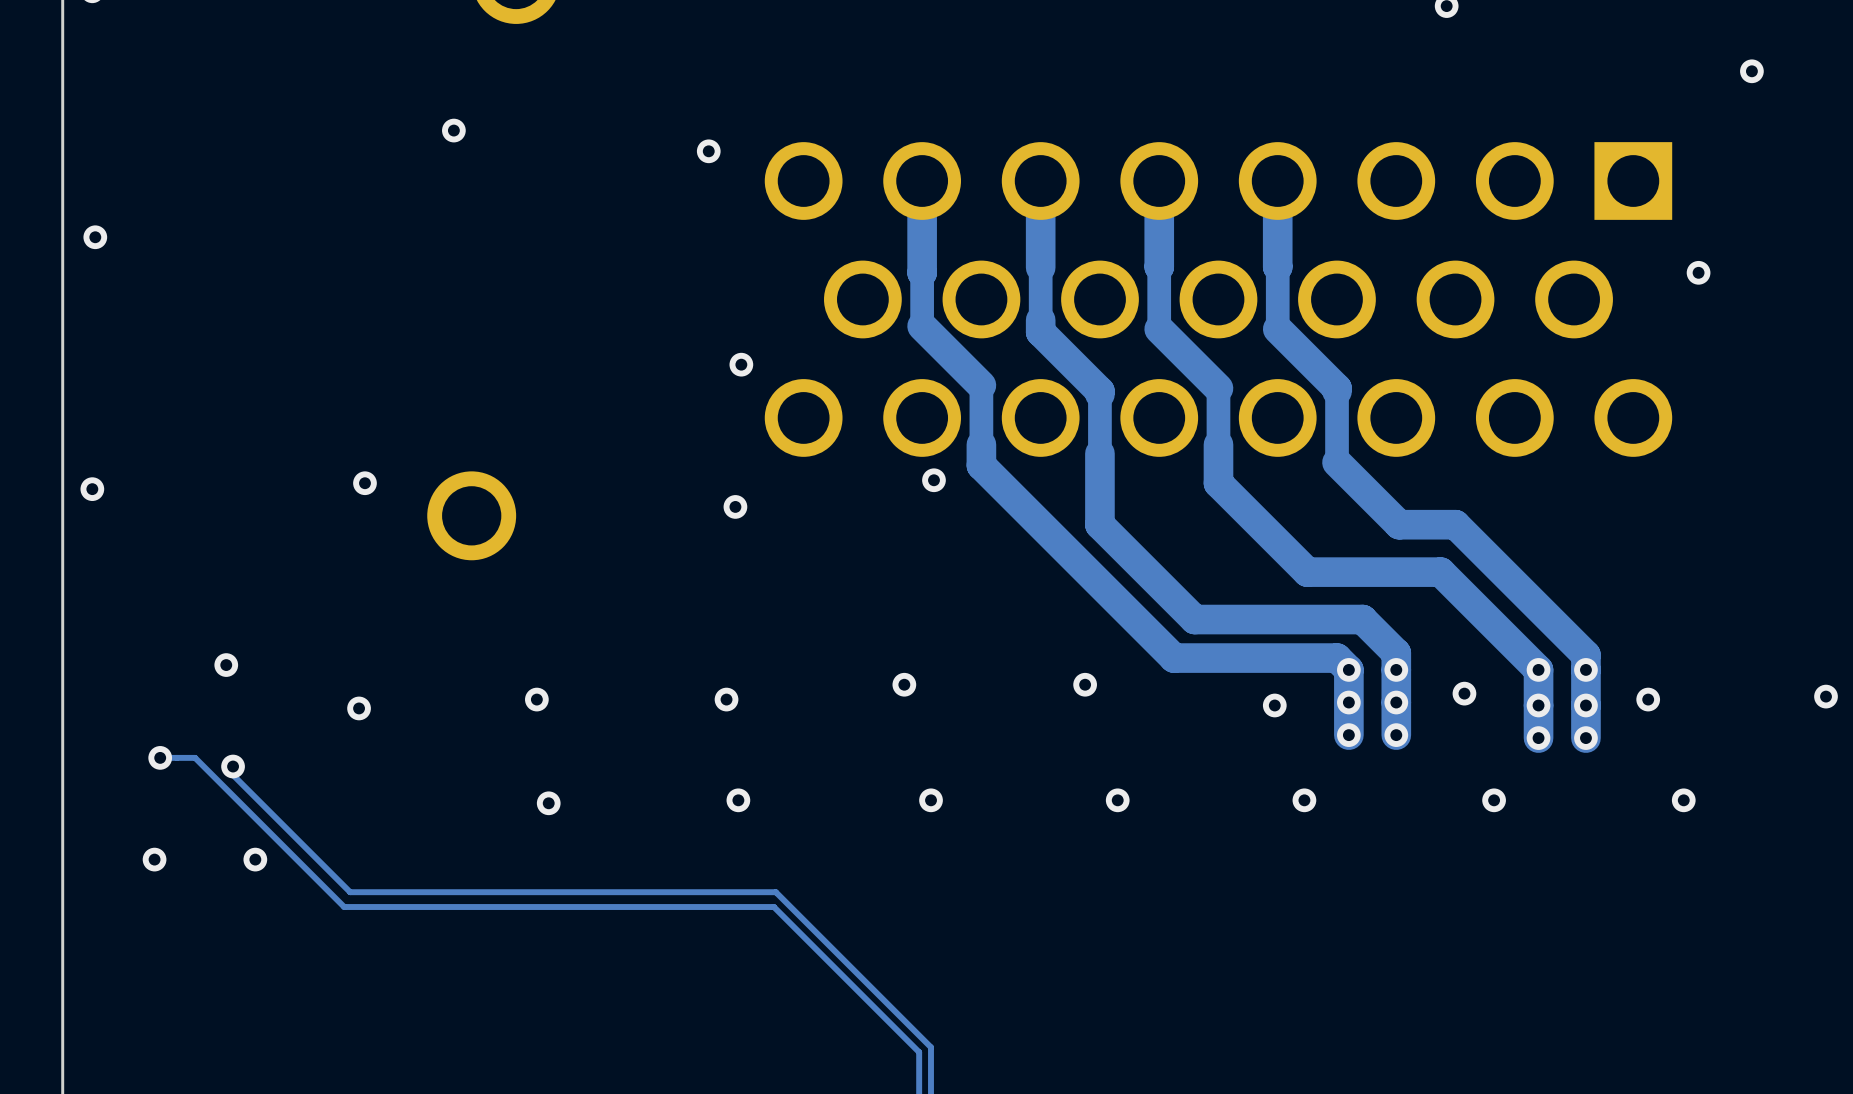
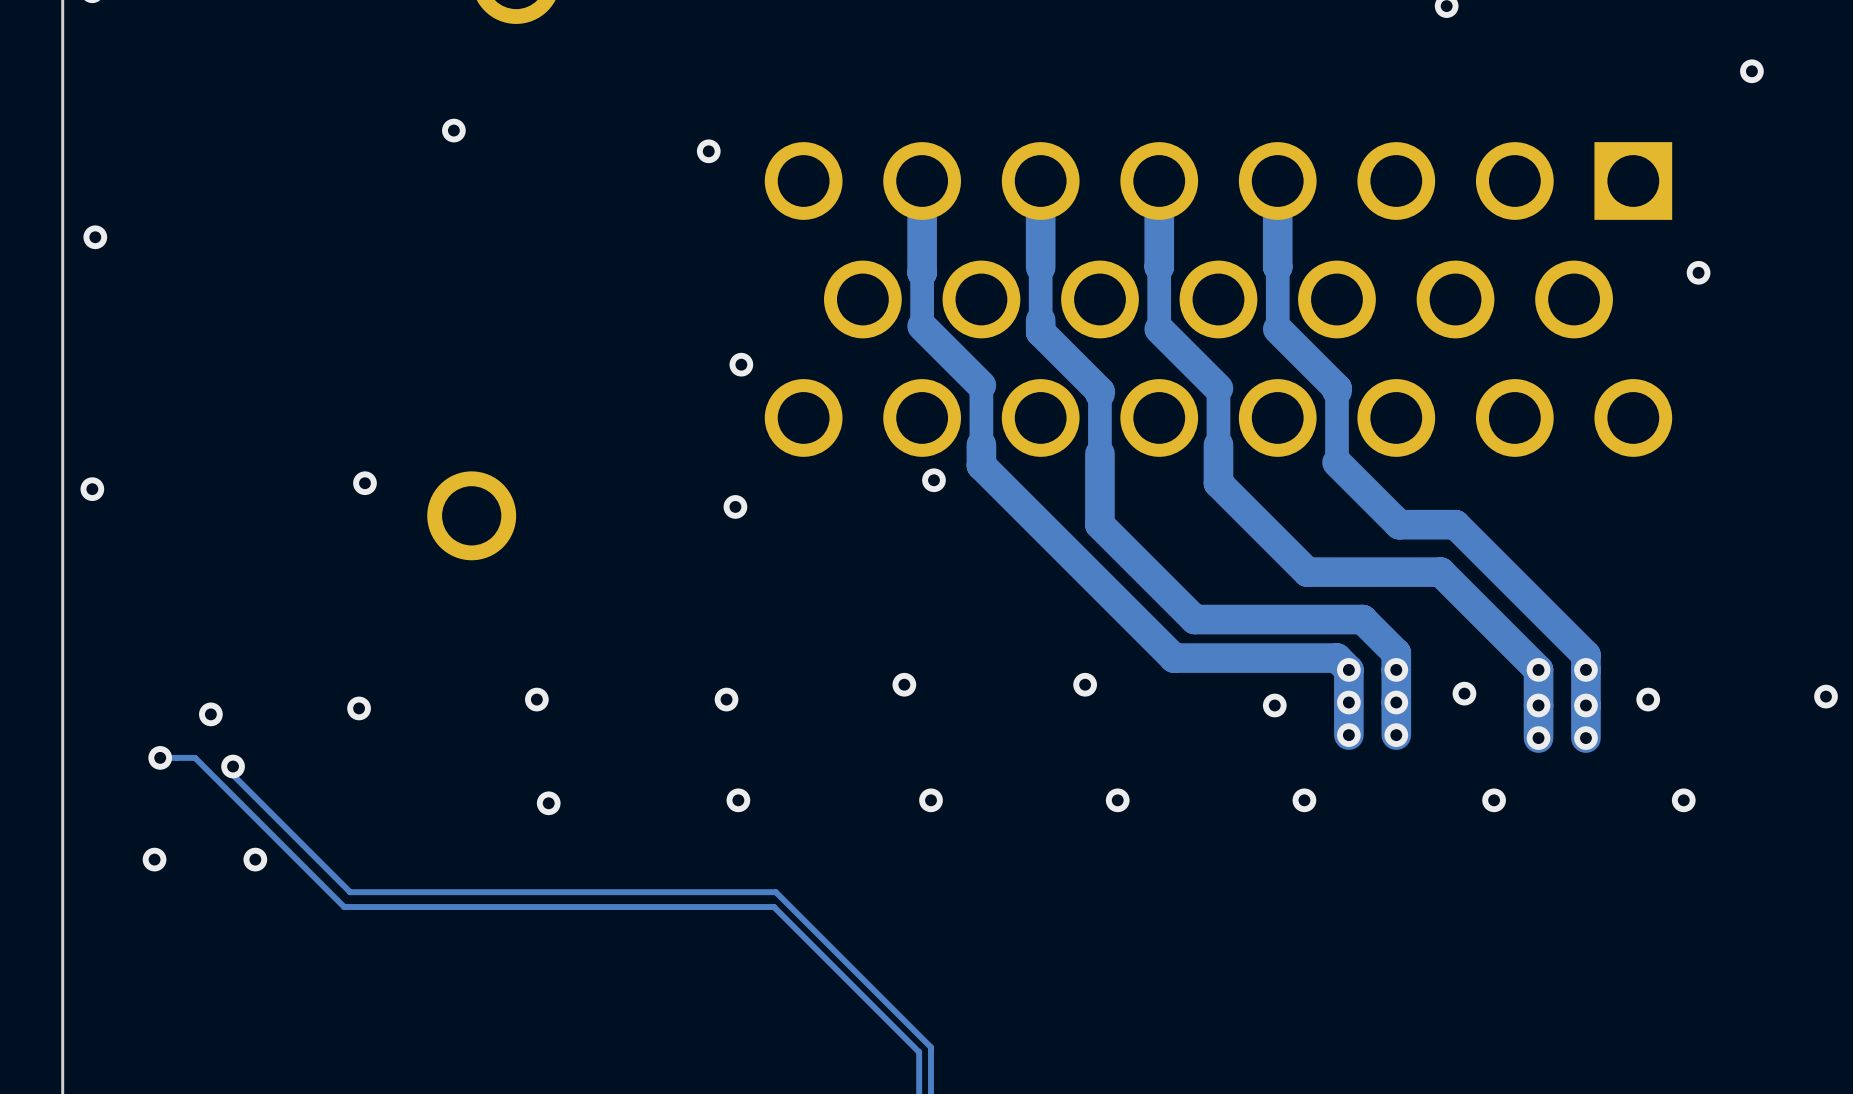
via position: (226, 665) -> (210, 714)

